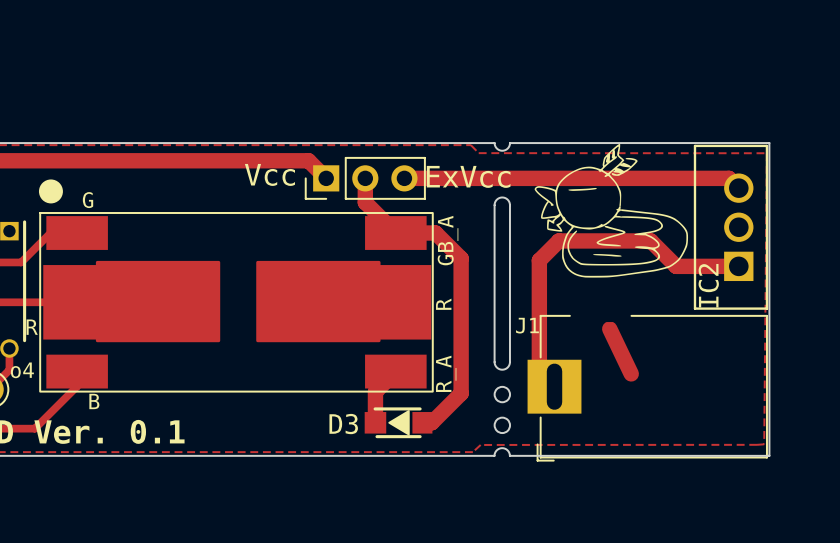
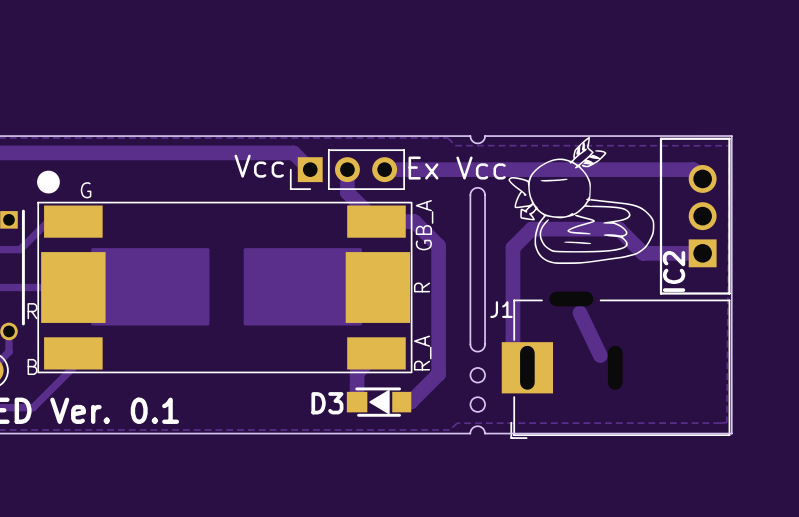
text: ExVcc (468, 176) -> Ex Vcc (457, 168)
text: o4 (22, 370) -> none
part text position: B (94, 401) -> B (32, 366)

